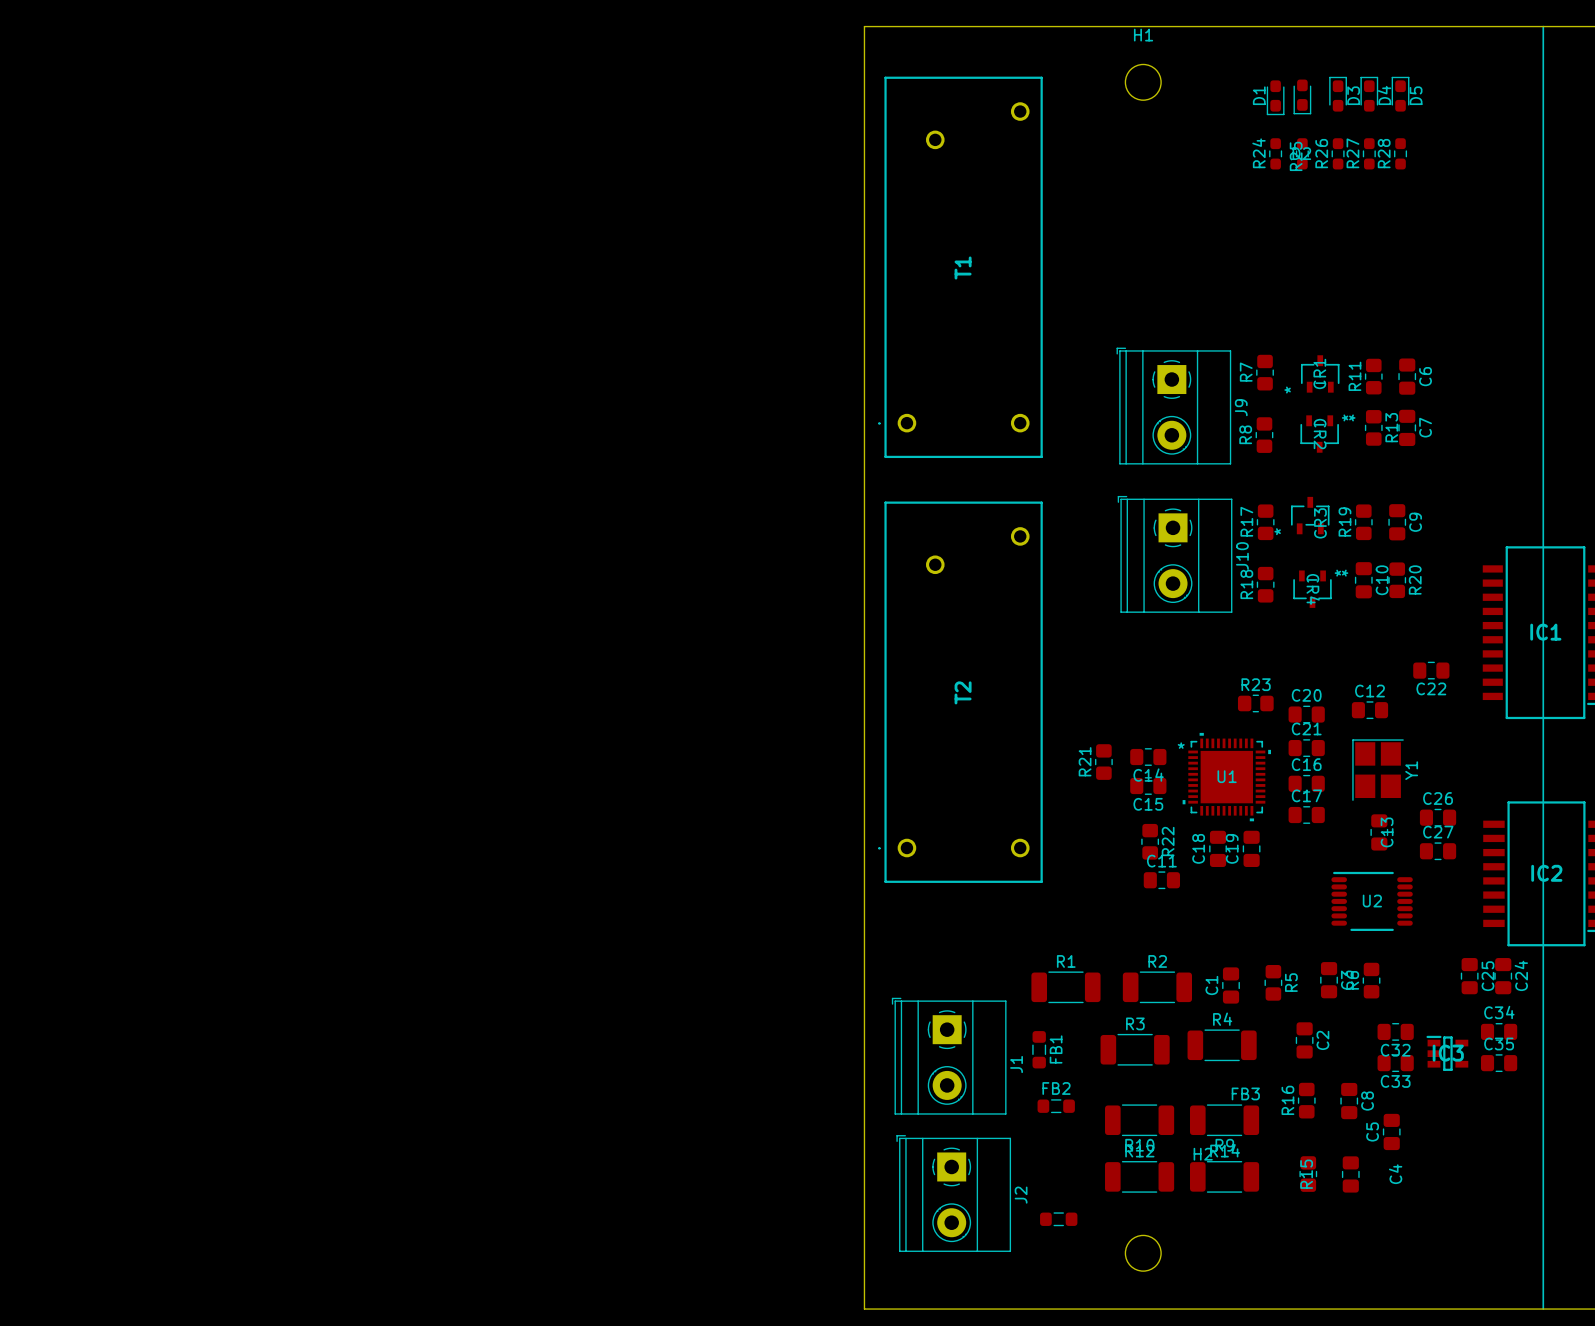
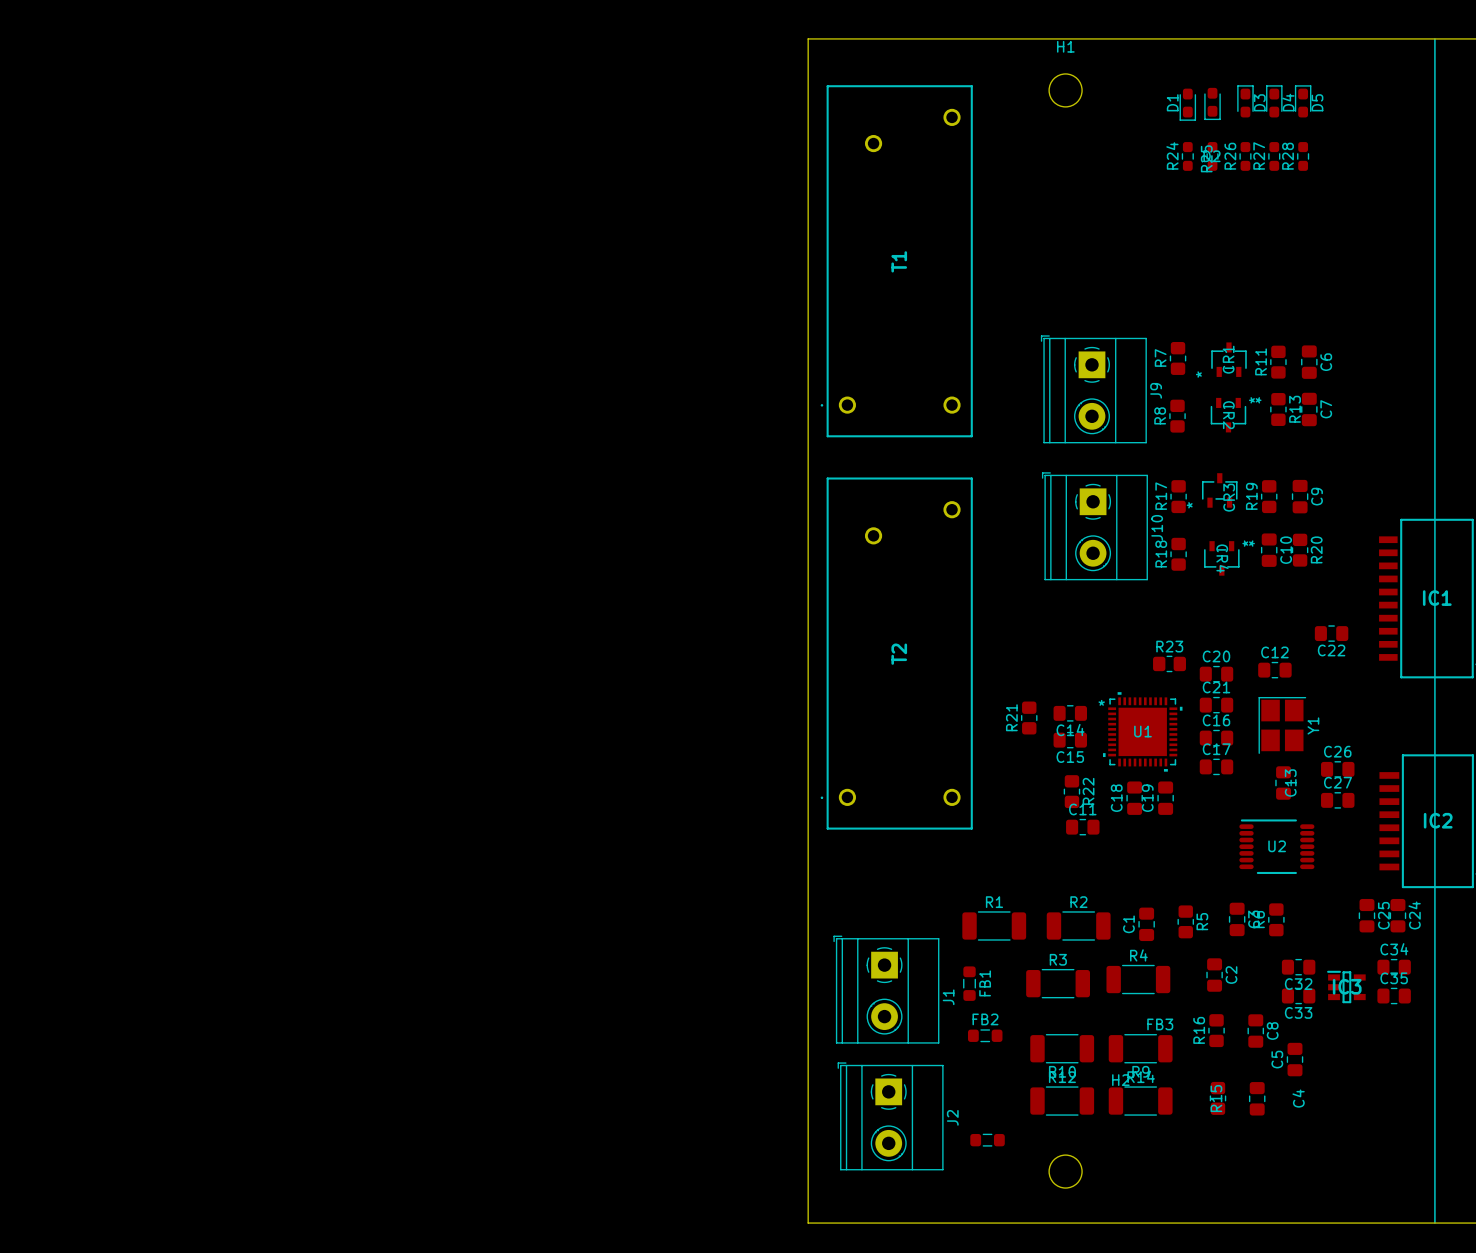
U1 footprint: [1182, 732, 1272, 822] -> [1102, 692, 1183, 772]

